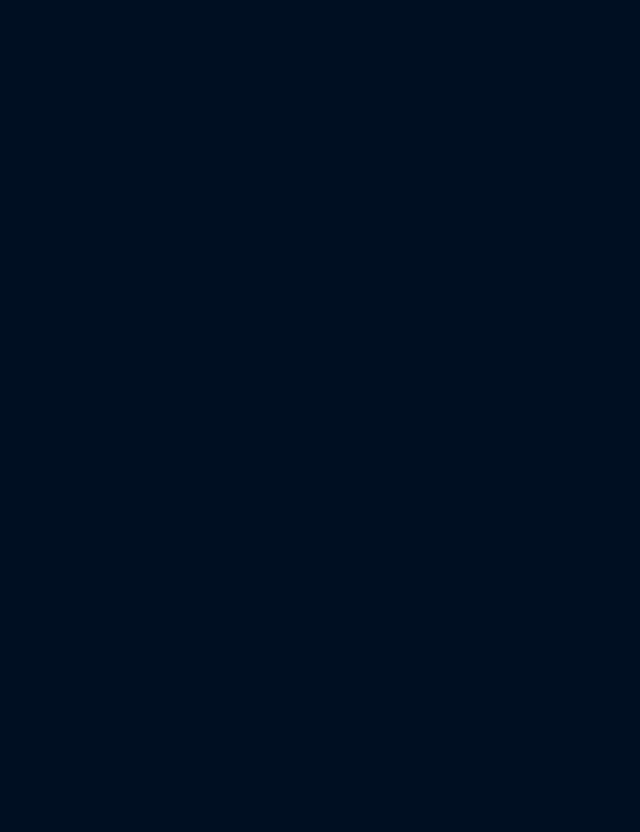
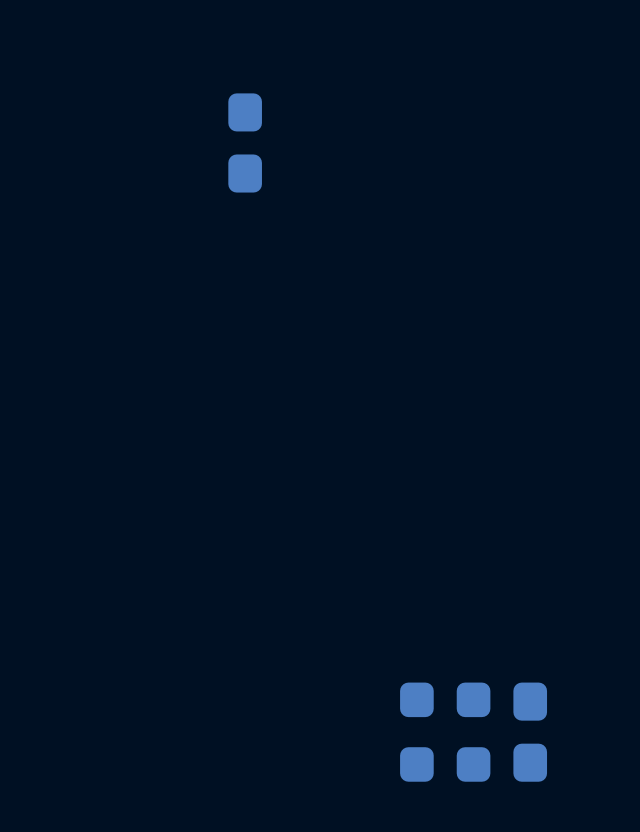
part: none -> (245, 142)
part: none -> (416, 732)
part: none -> (473, 732)
part: none -> (530, 732)

